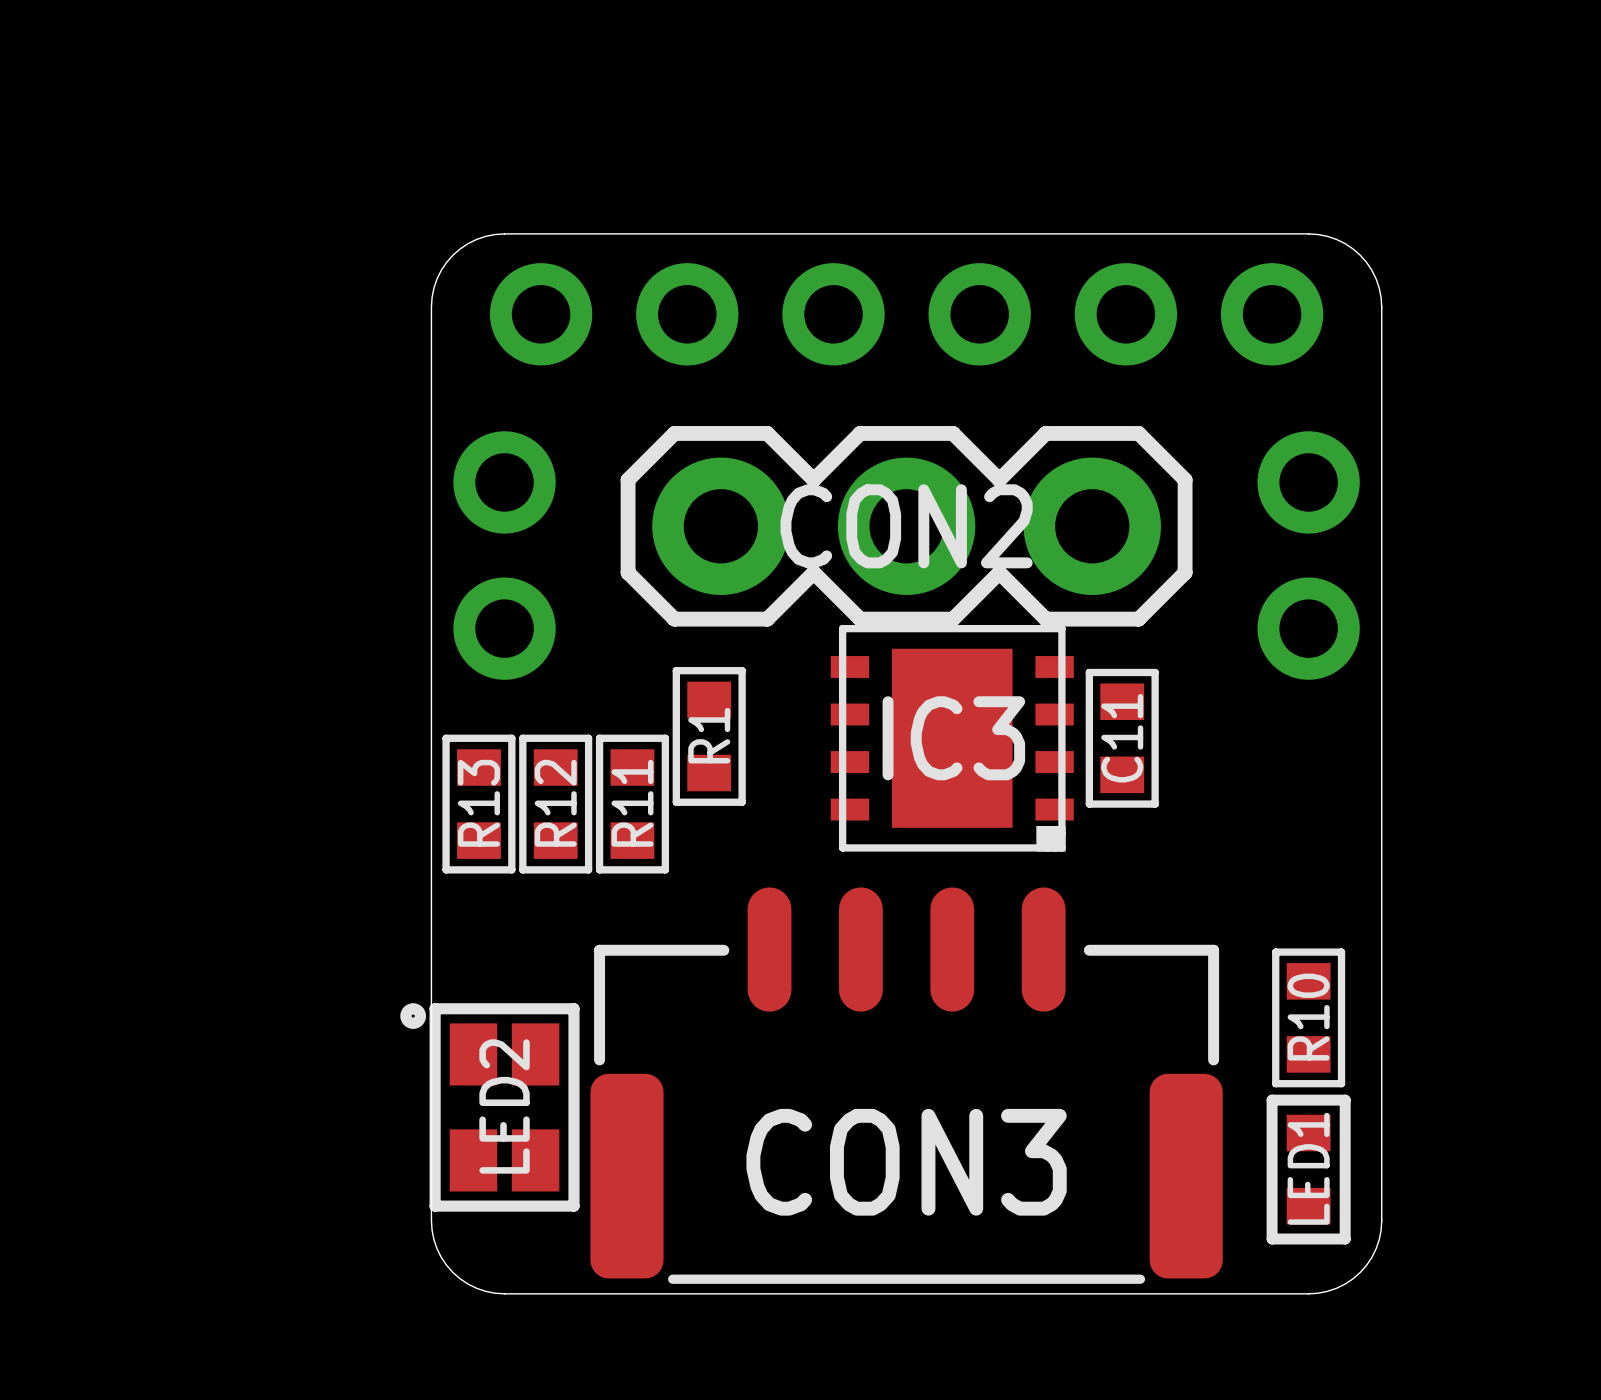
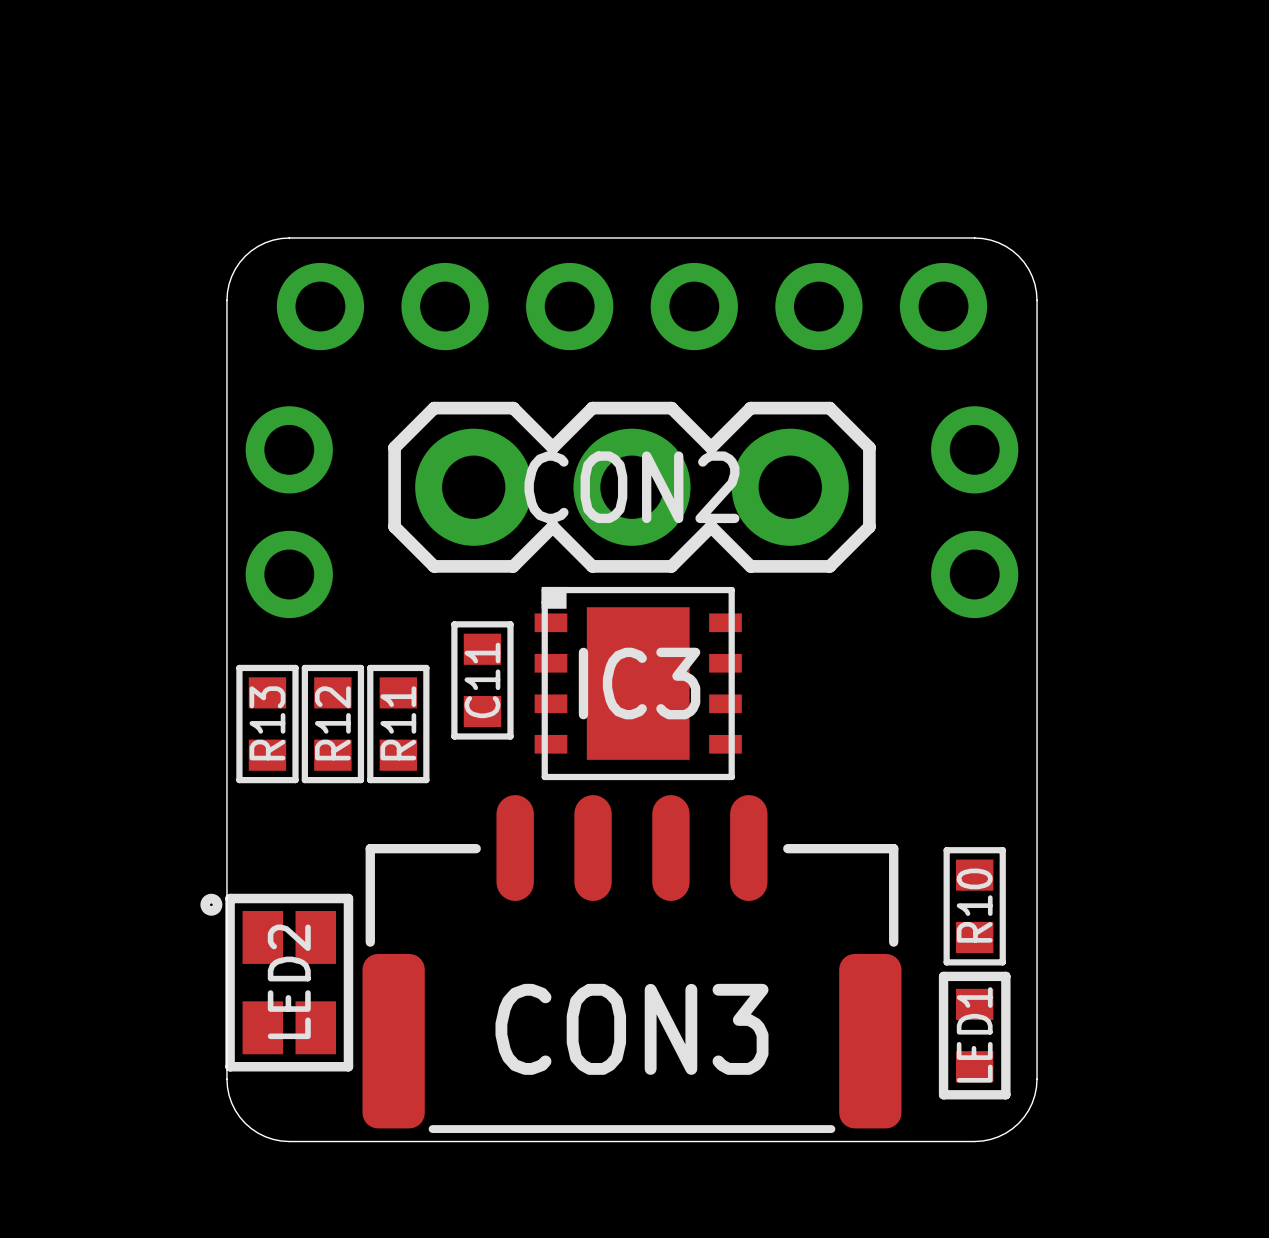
R1: (709, 736) -> none
IC3 rotation: 0° (952, 738) -> 180° (638, 683)
C11 position: (1122, 738) -> (482, 680)

